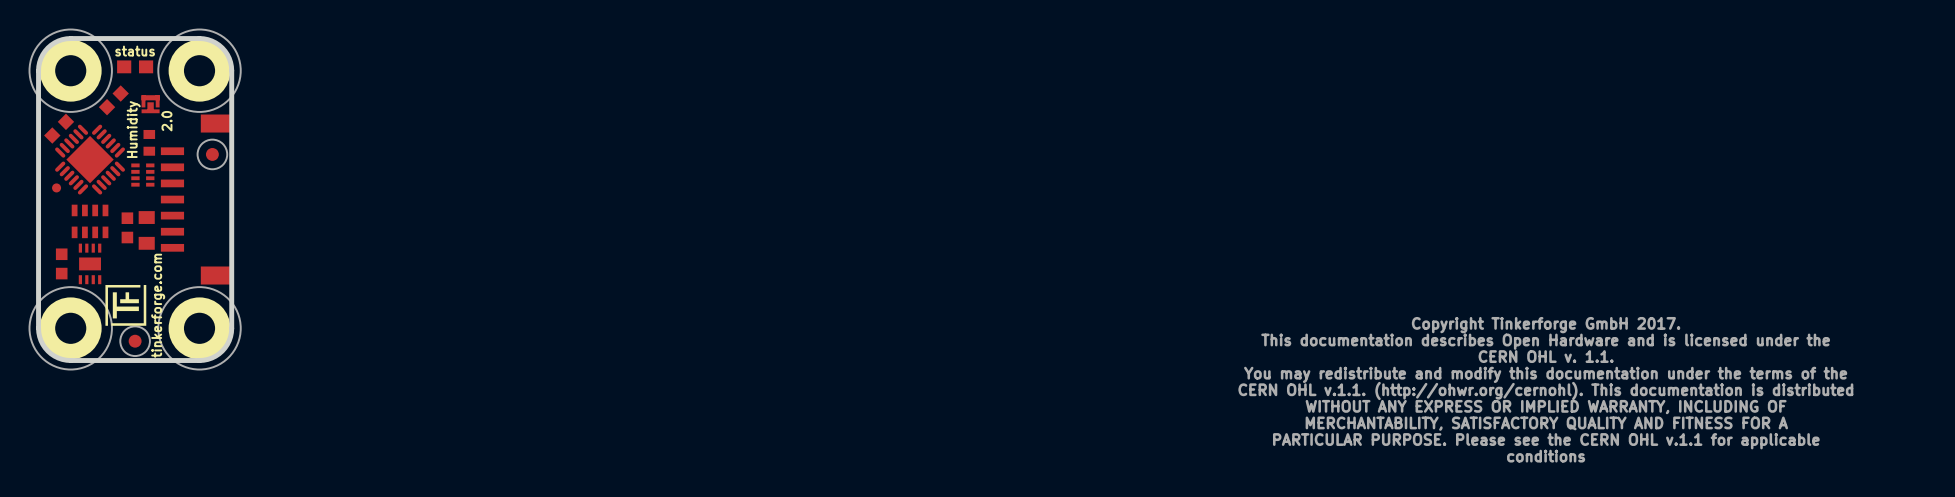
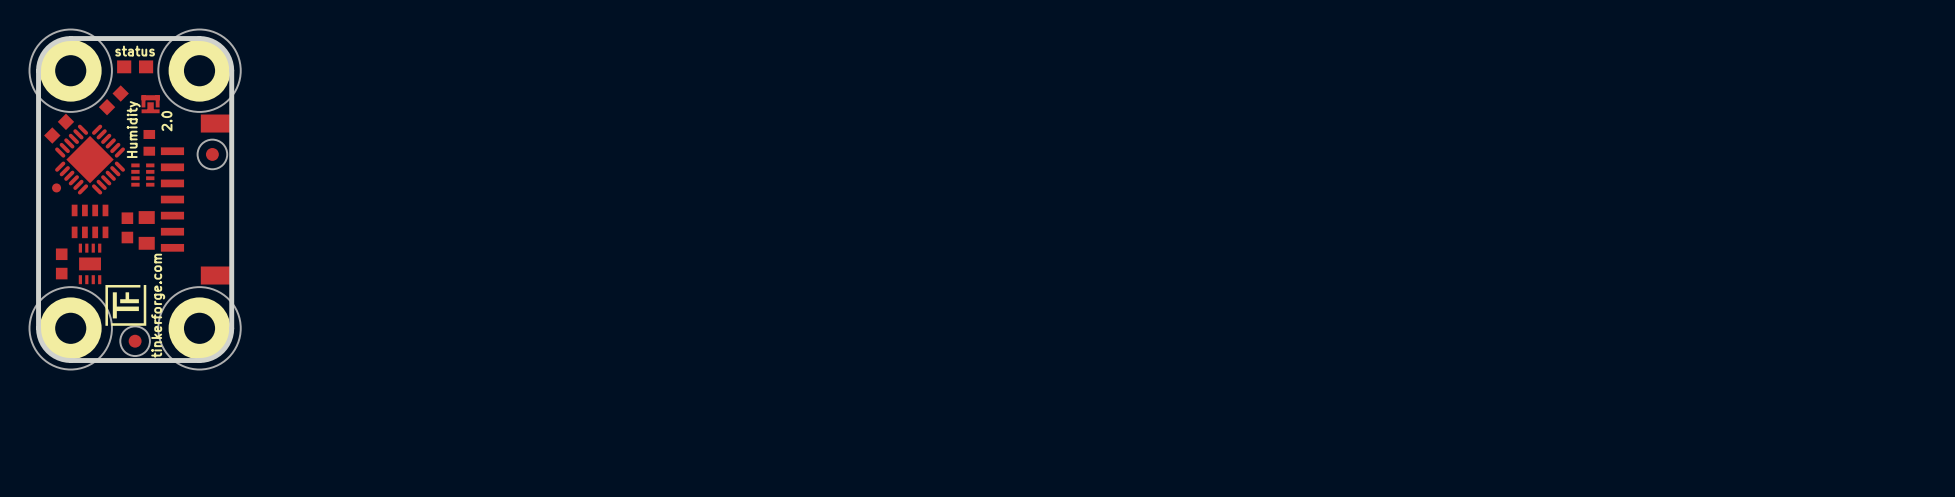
text: Copyright Tinkerforge GmbH 2017. (1546, 325) -> none
text: This documentation describes Open Hardware and is licensed under the (1545, 341) -> none
text: CERN OHL v. 1.1. (1546, 356) -> none
text: You may redistribute and modify this documentation under the terms of the (1545, 374) -> none
text: CERN OHL v.1.1. (http://ohwr.org/cernohl). This documentation is distributed (1545, 390) -> none
text: WITHOUT ANY EXPRESS OR IMPLIED WARRANTY, INCLUDING OF (1546, 407) -> none
text: MERCHANTABILITY, SATISFACTORY QUALITY AND FITNESS FOR A (1546, 423) -> none
text: PARTICULAR PURPOSE. Please see the CERN OHL v.1.1 for applicable (1546, 441) -> none
text: conditions (1546, 456) -> none

